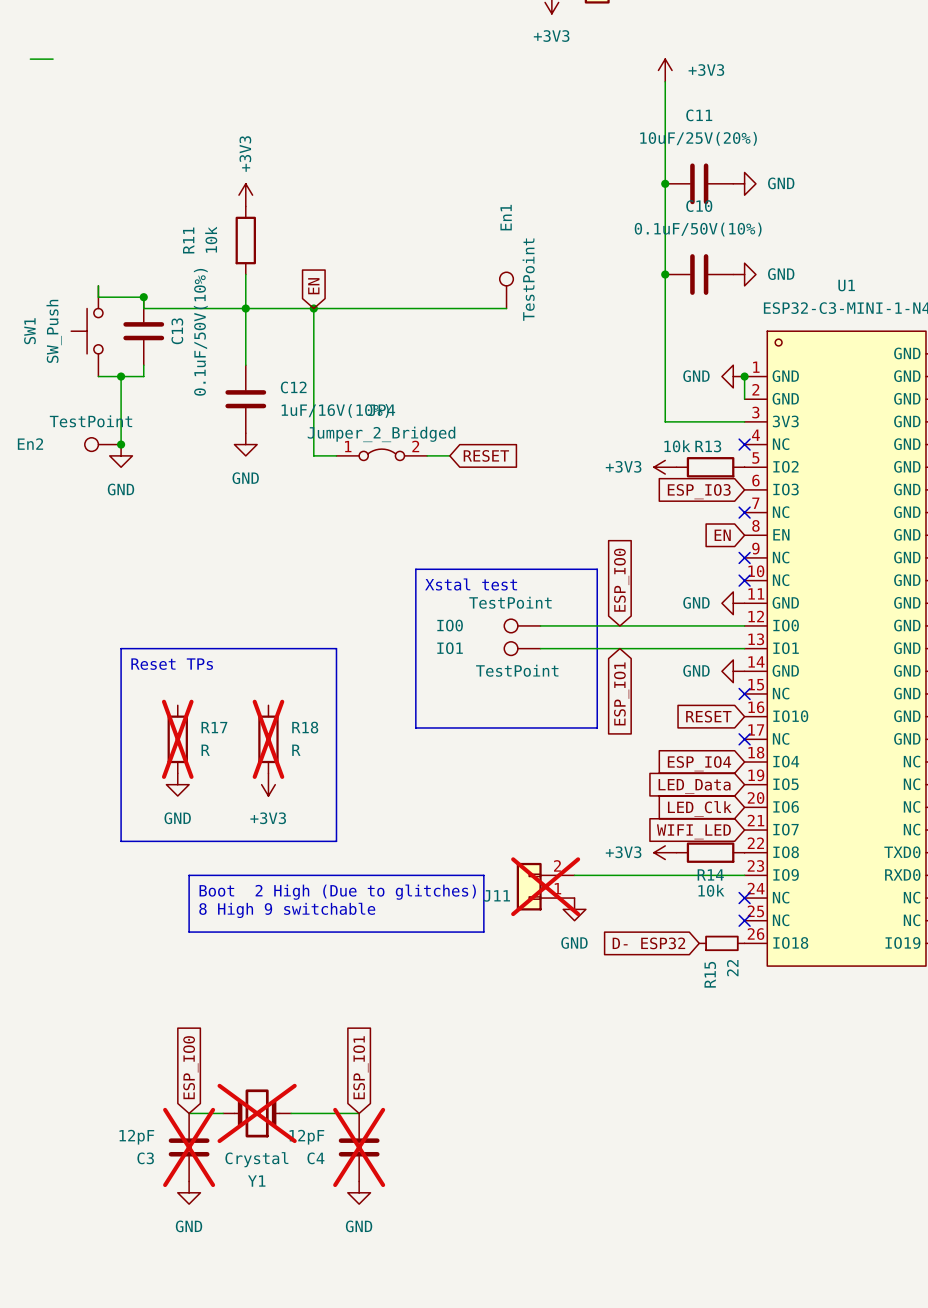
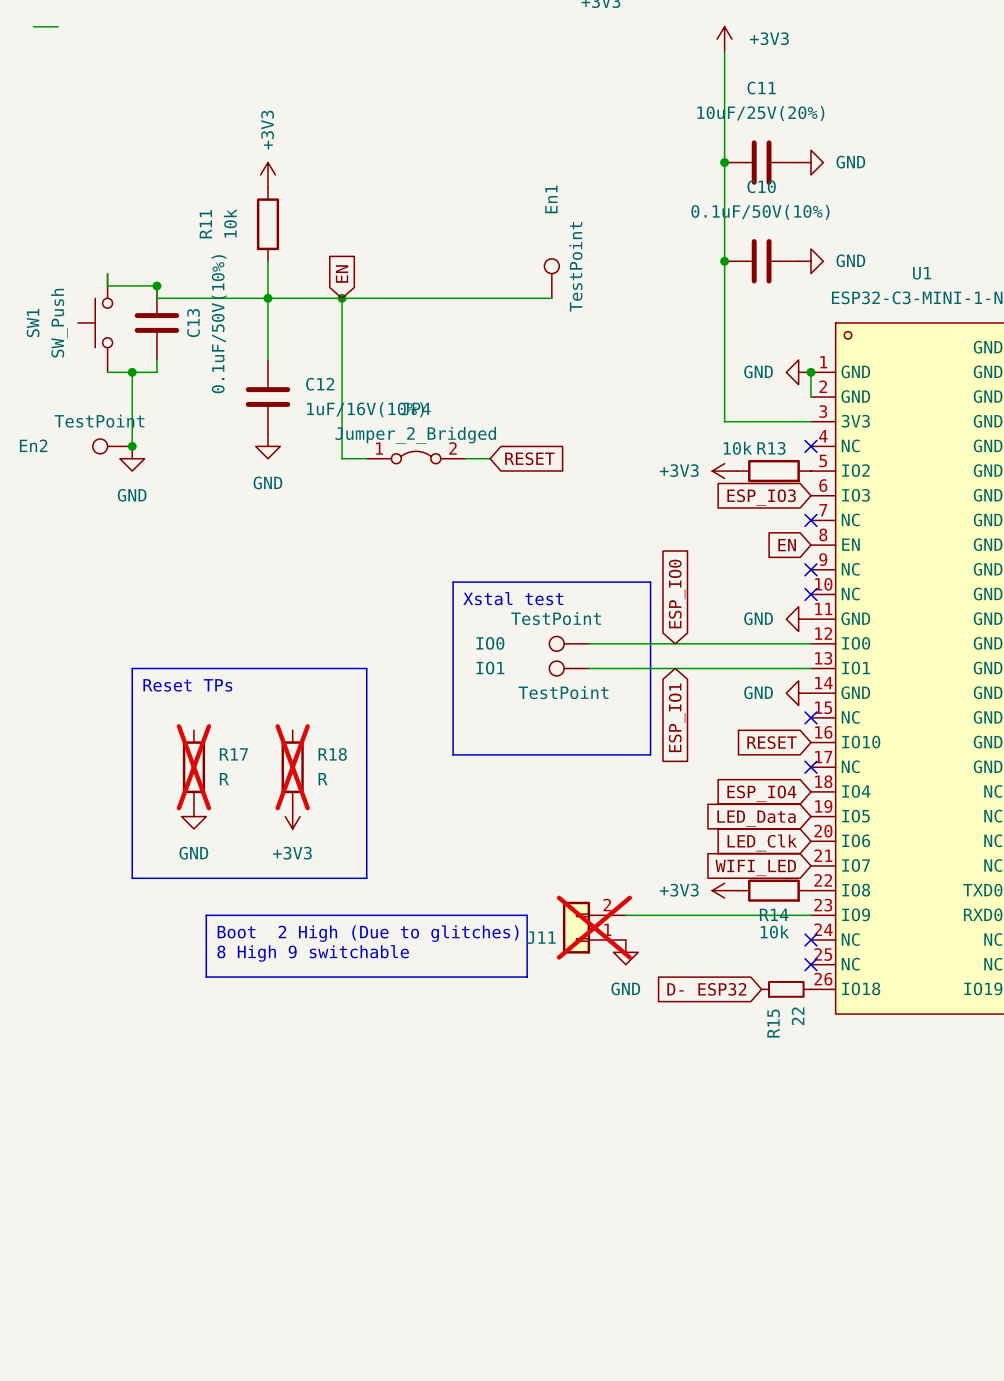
global label: ESP_IO0 (190, 1067) -> none
global label: ESP_IO1 (360, 1067) -> none
wire: (189, 1113) (223, 1113) -> none
Y1: Crystal (257, 1113) -> none
wire: (291, 1113) (359, 1113) -> none
C3: 12pF (189, 1147) -> none
C4: 12pF (359, 1147) -> none
power symbol: GND (189, 1192) -> none
power symbol: GND (359, 1192) -> none

